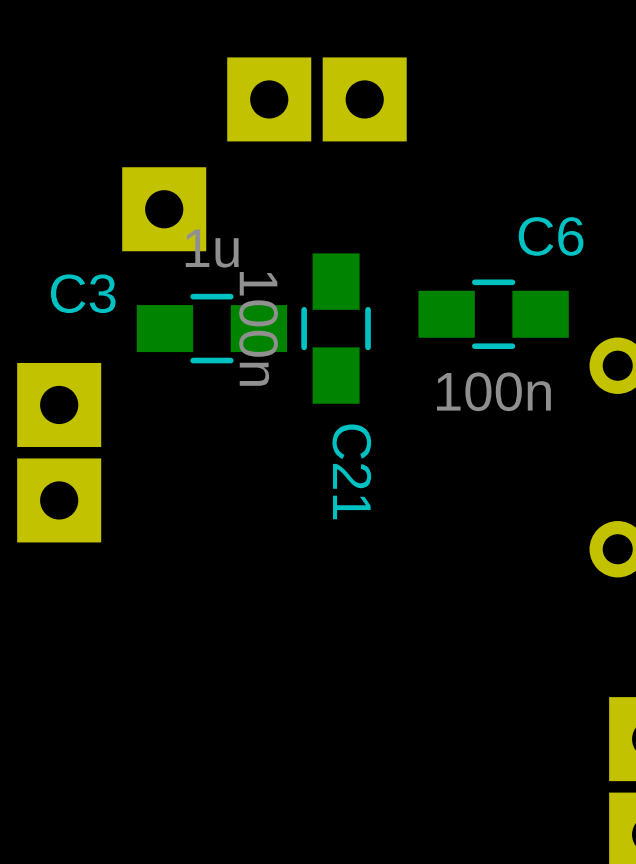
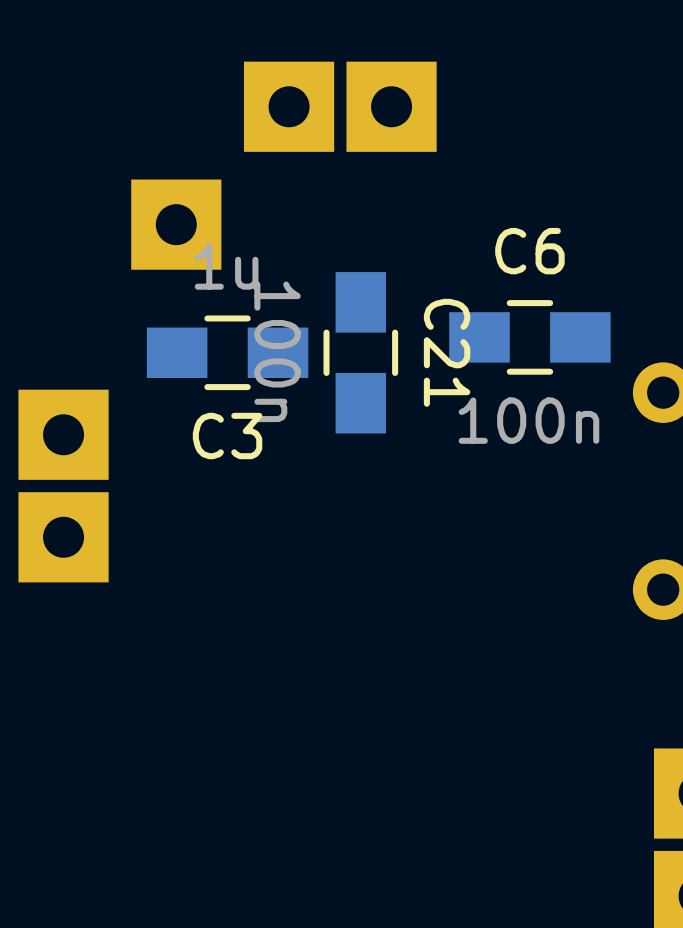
C6 name position: C6 (551, 236) -> C6 (529, 251)
C3 name position: C3 (83, 293) -> C3 (227, 436)
C21 name position: C21 (351, 471) -> C21 (447, 352)

